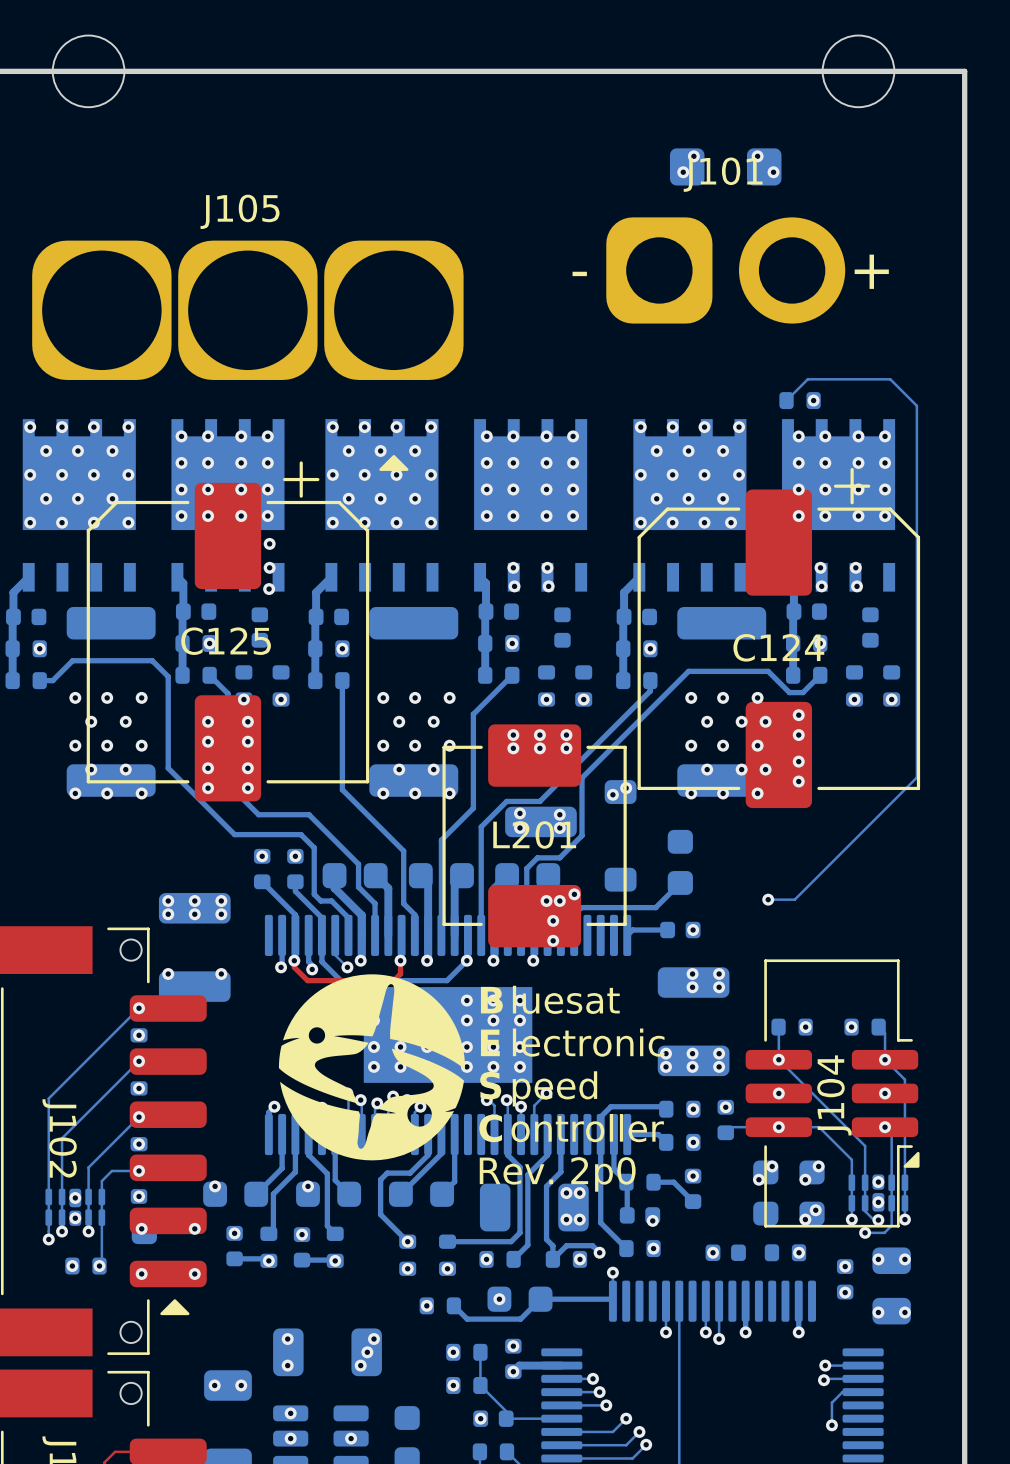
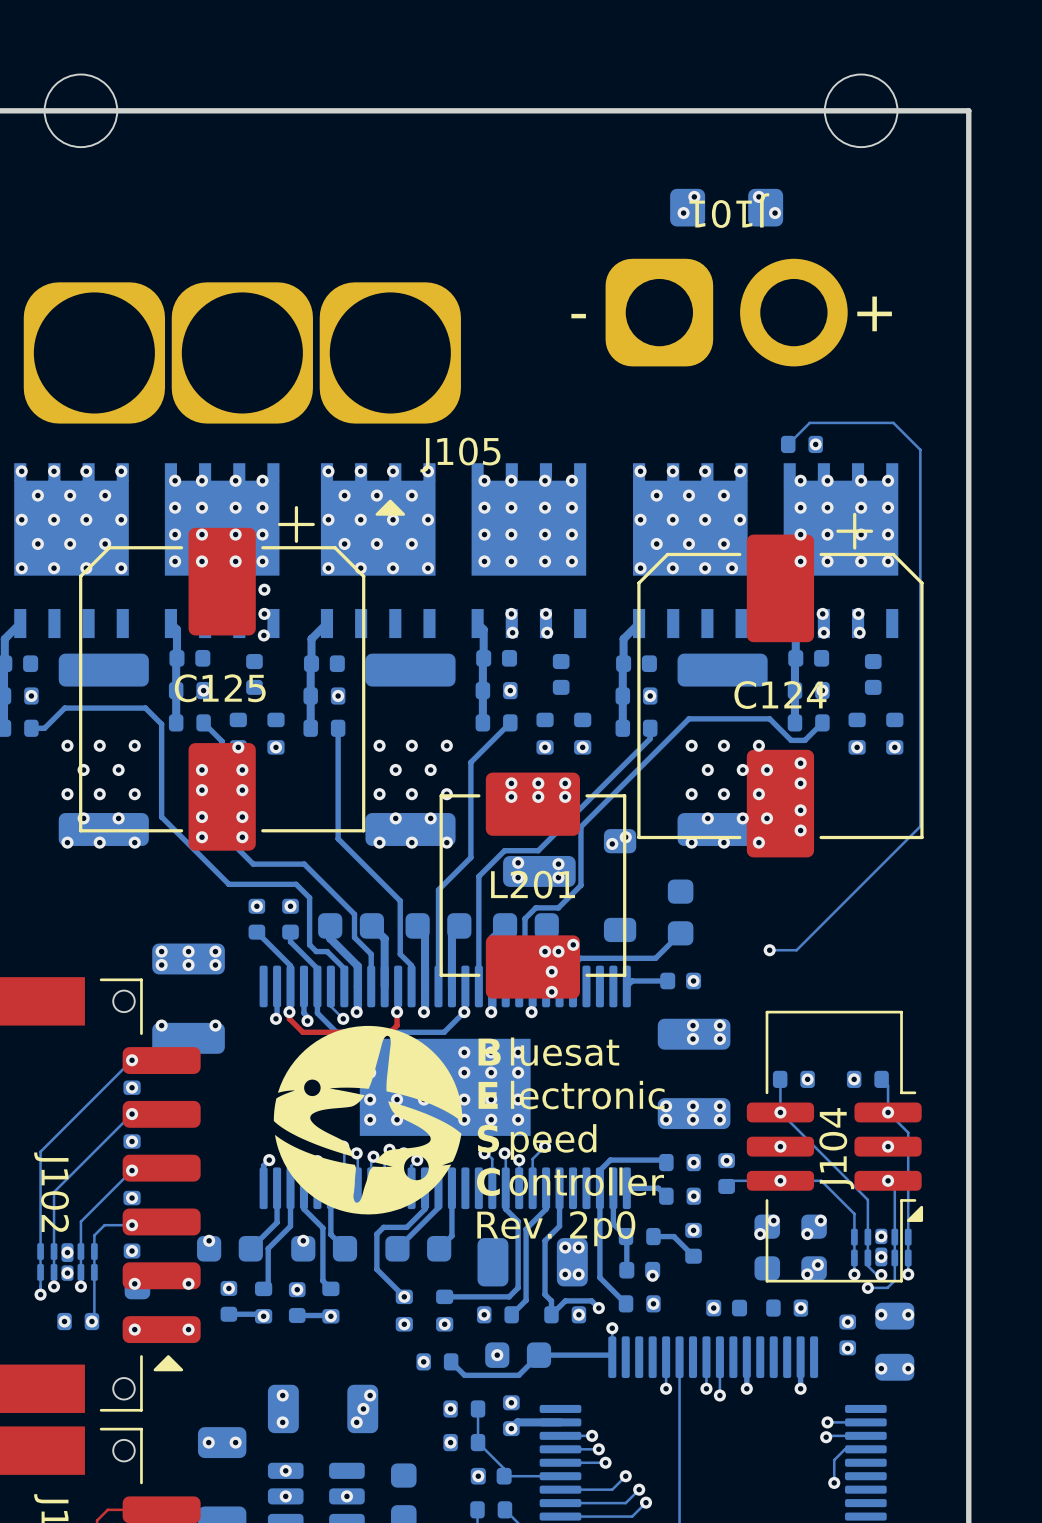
J101 name rotation: 0° (723, 174) -> 180° (729, 210)
J105 name position: J105 (240, 211) -> J105 (460, 454)

